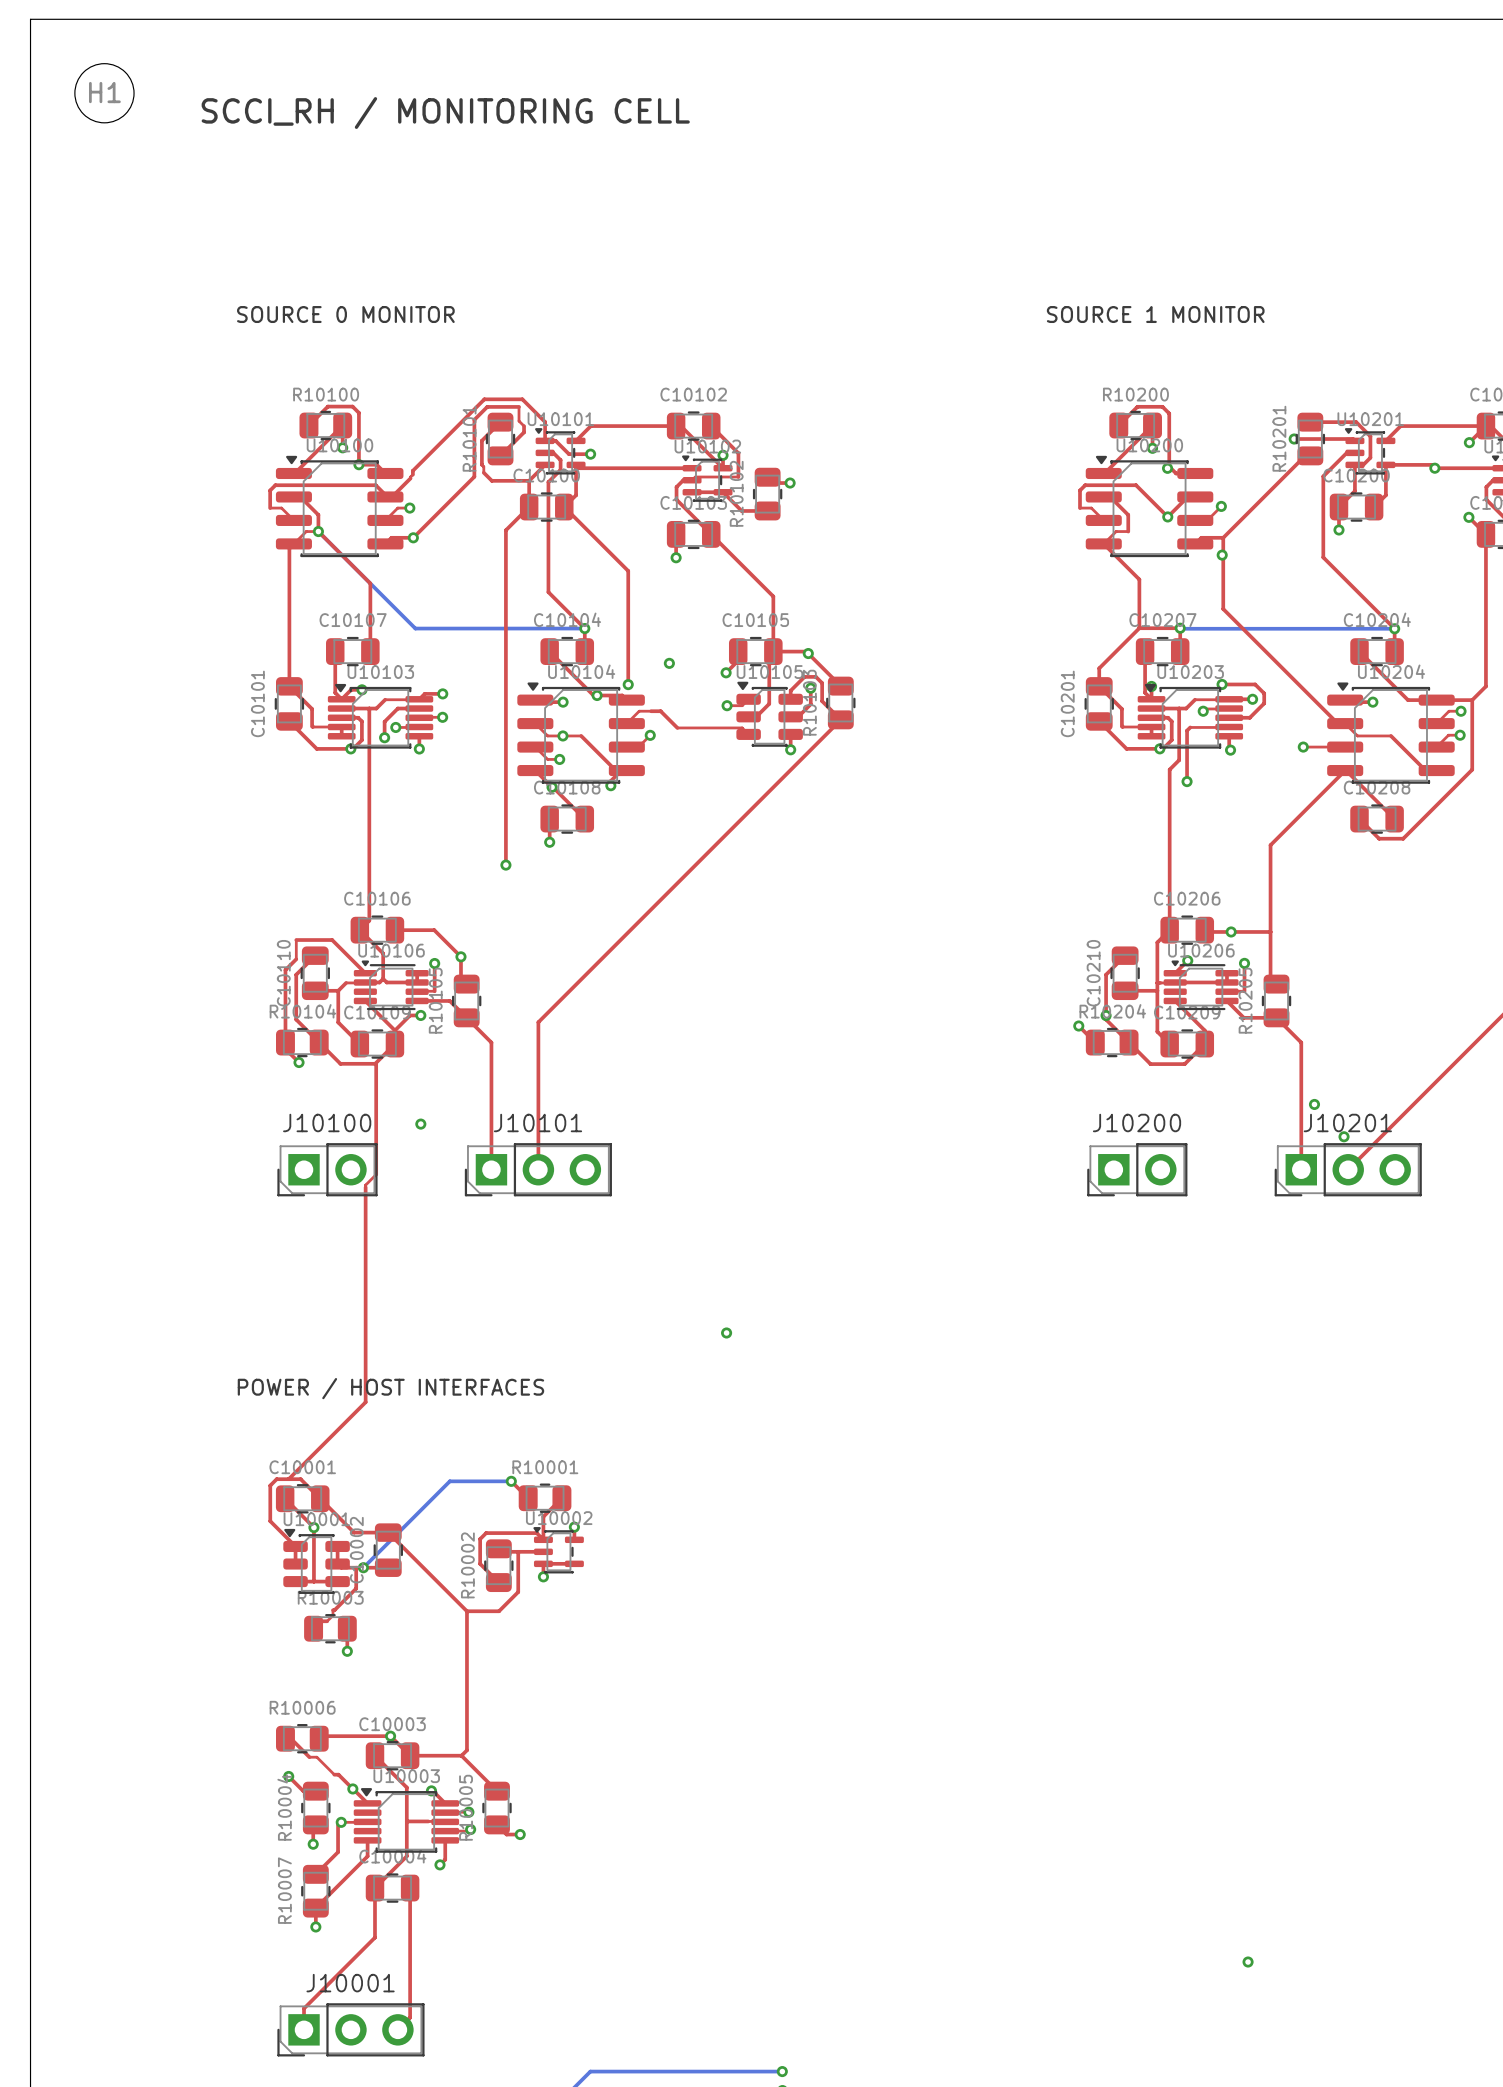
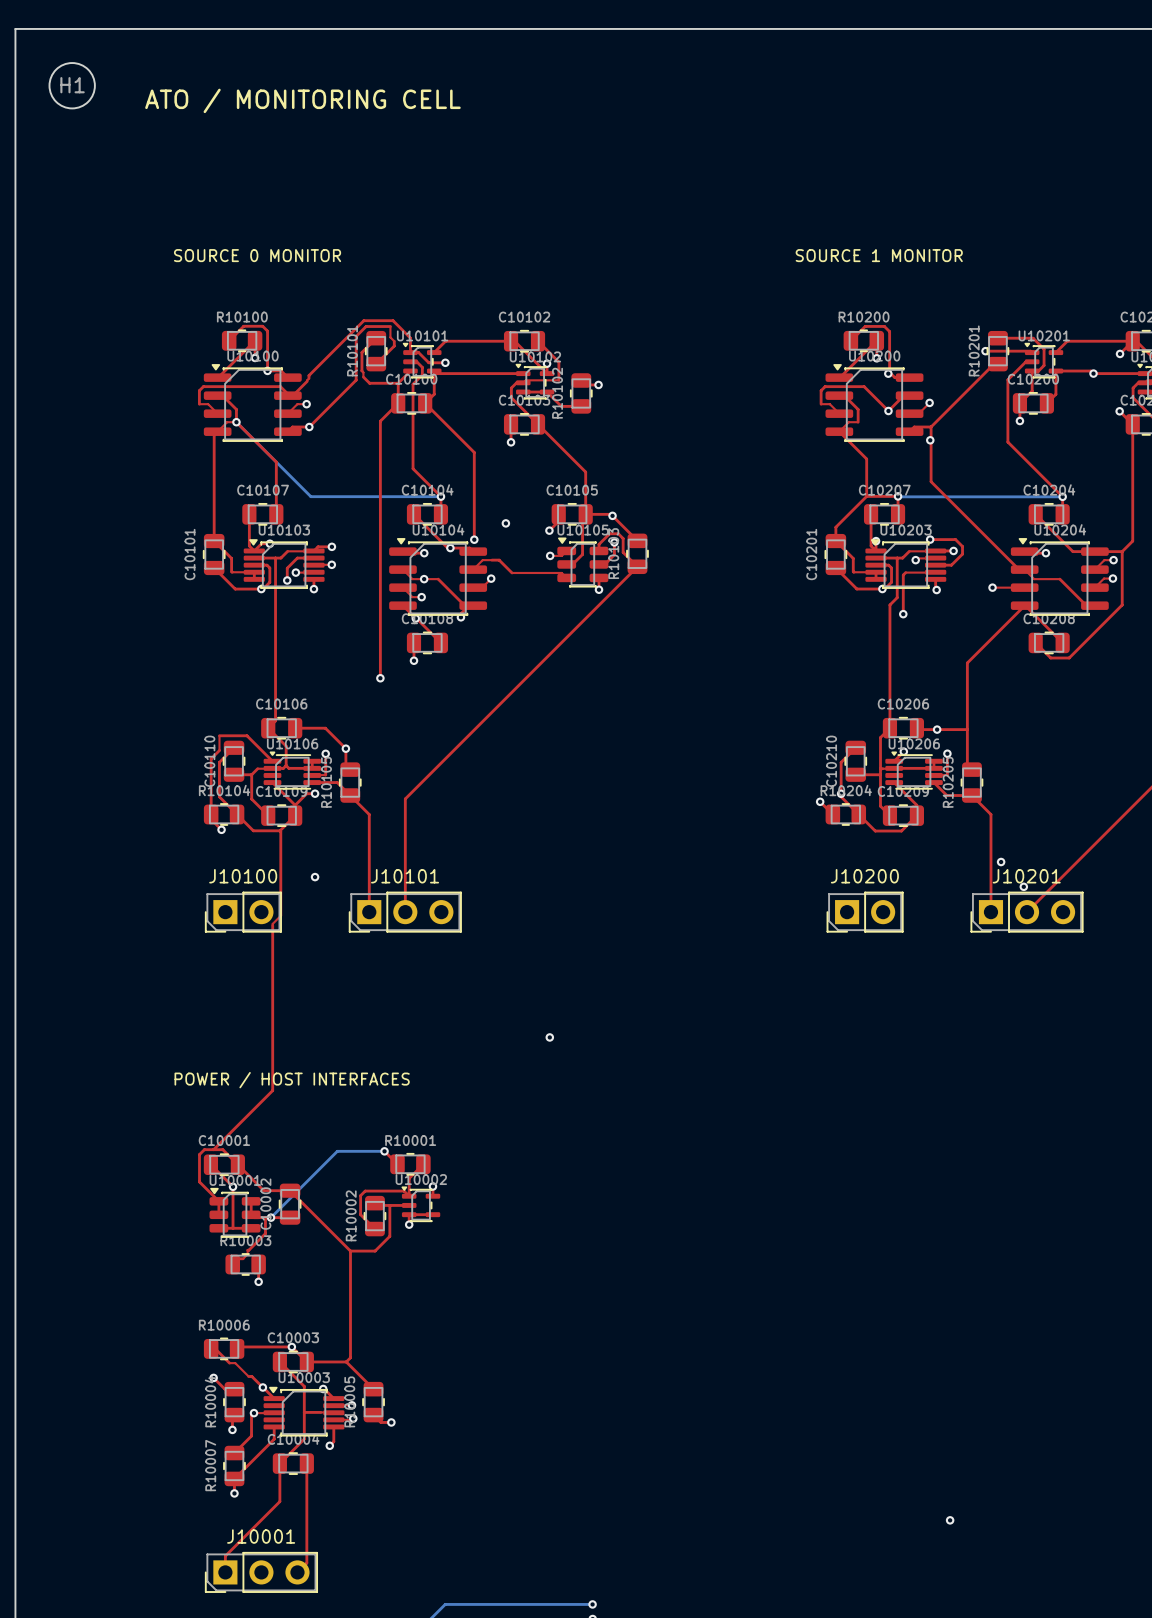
text: SCCI_RH / MONITORING CELL (445, 113) -> ATO / MONITORING CELL (302, 100)

